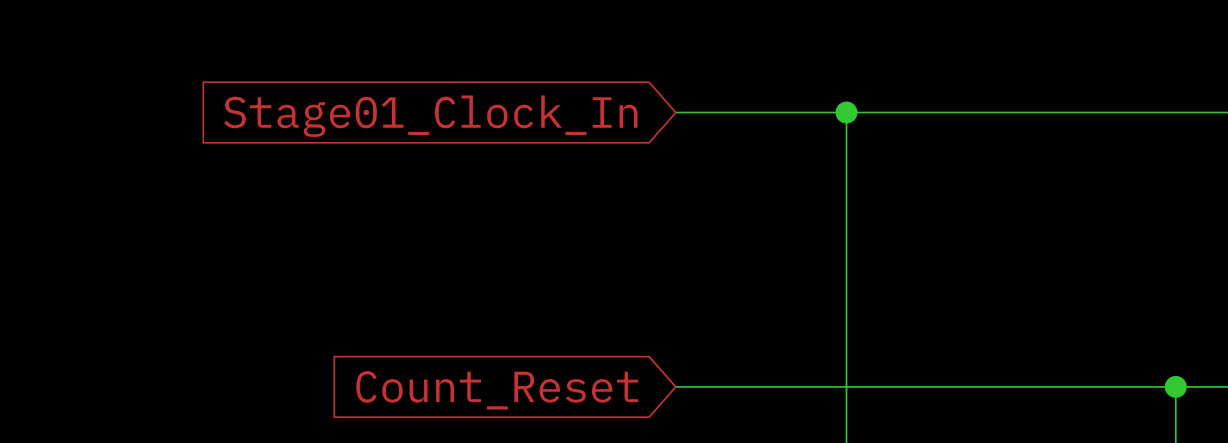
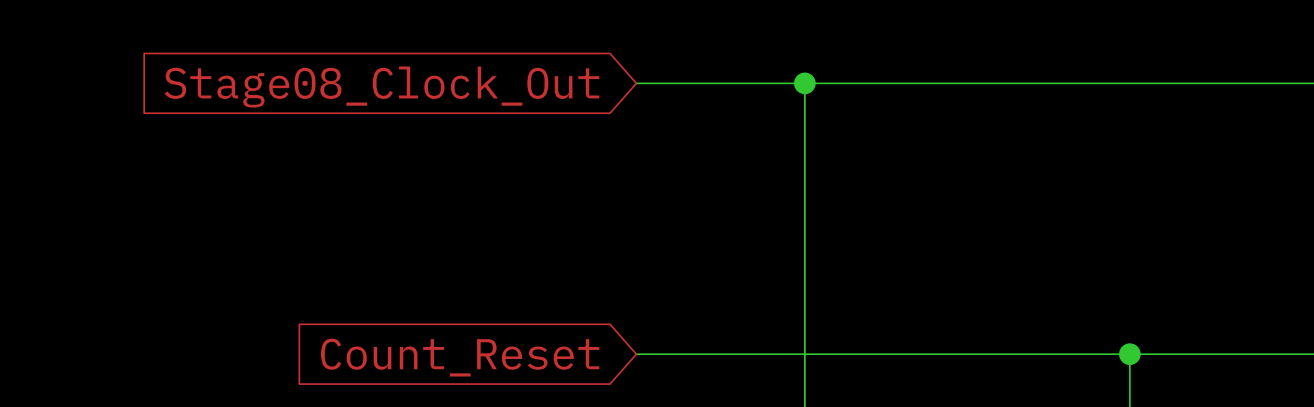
global label: Stage01_Clock_In (430, 116) -> Stage08_Clock_Out (382, 87)

